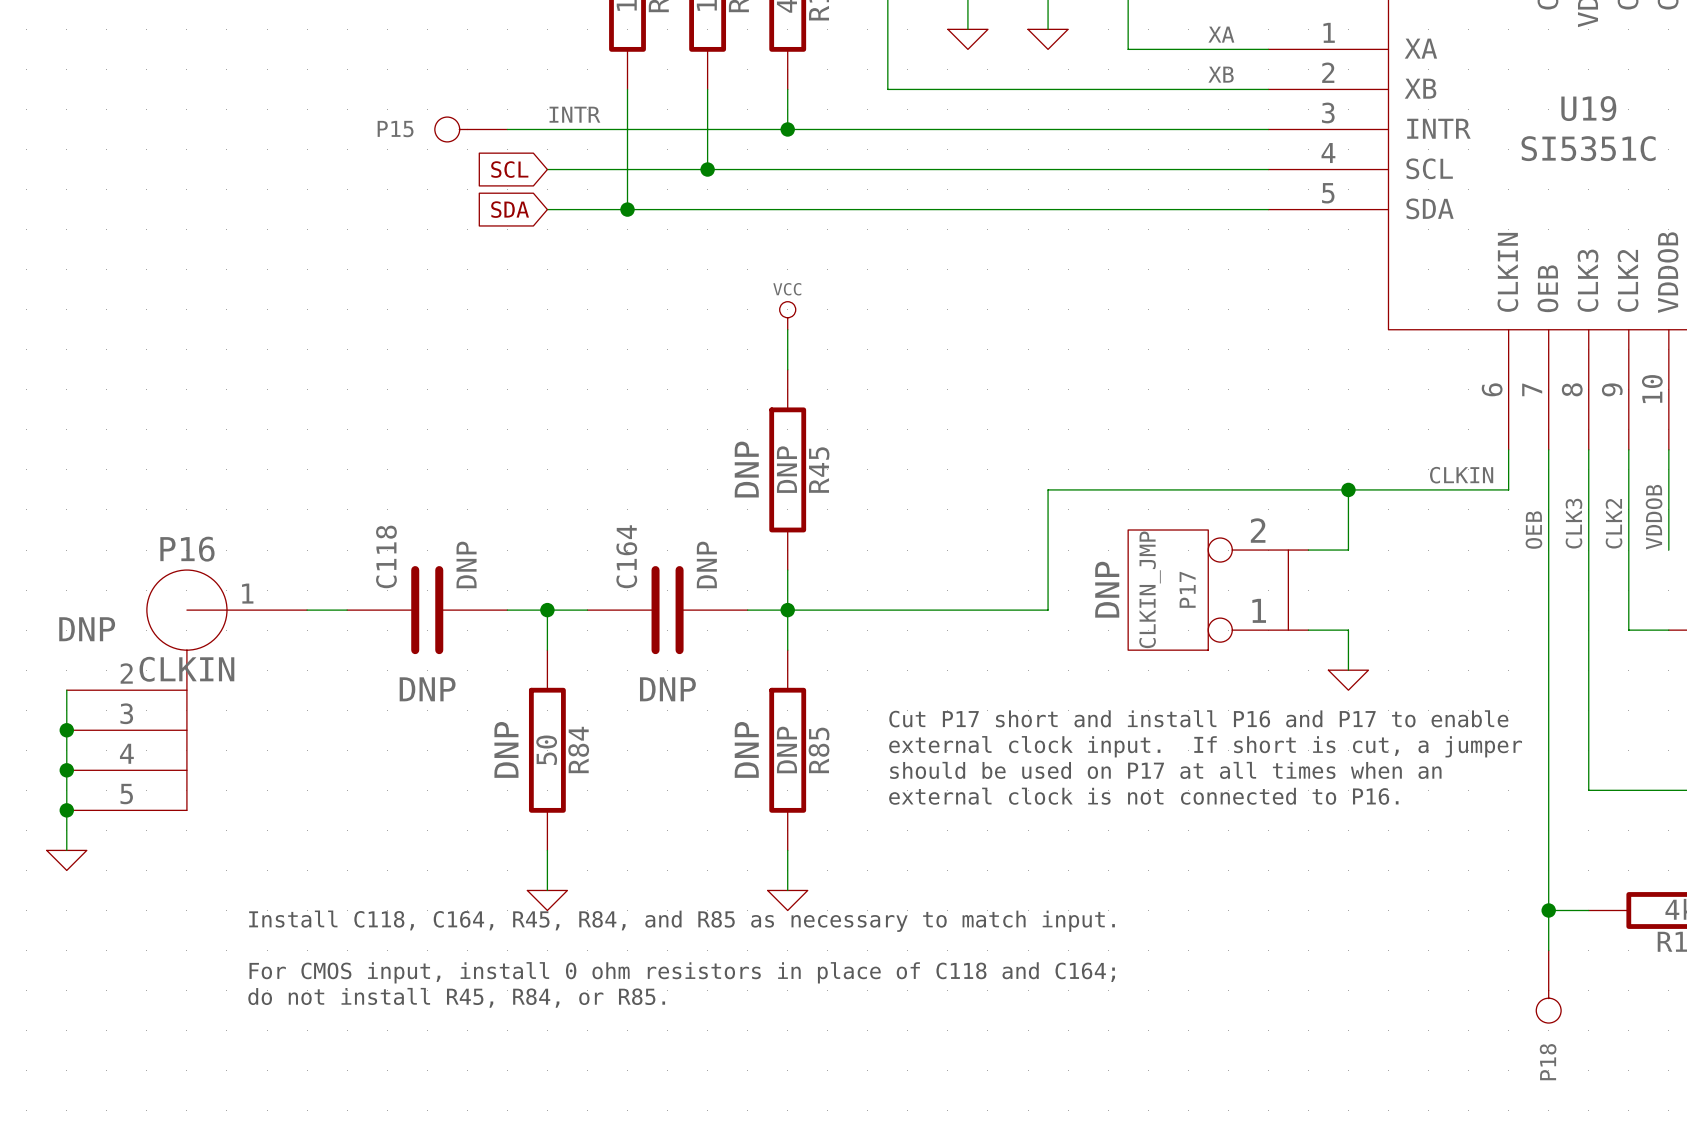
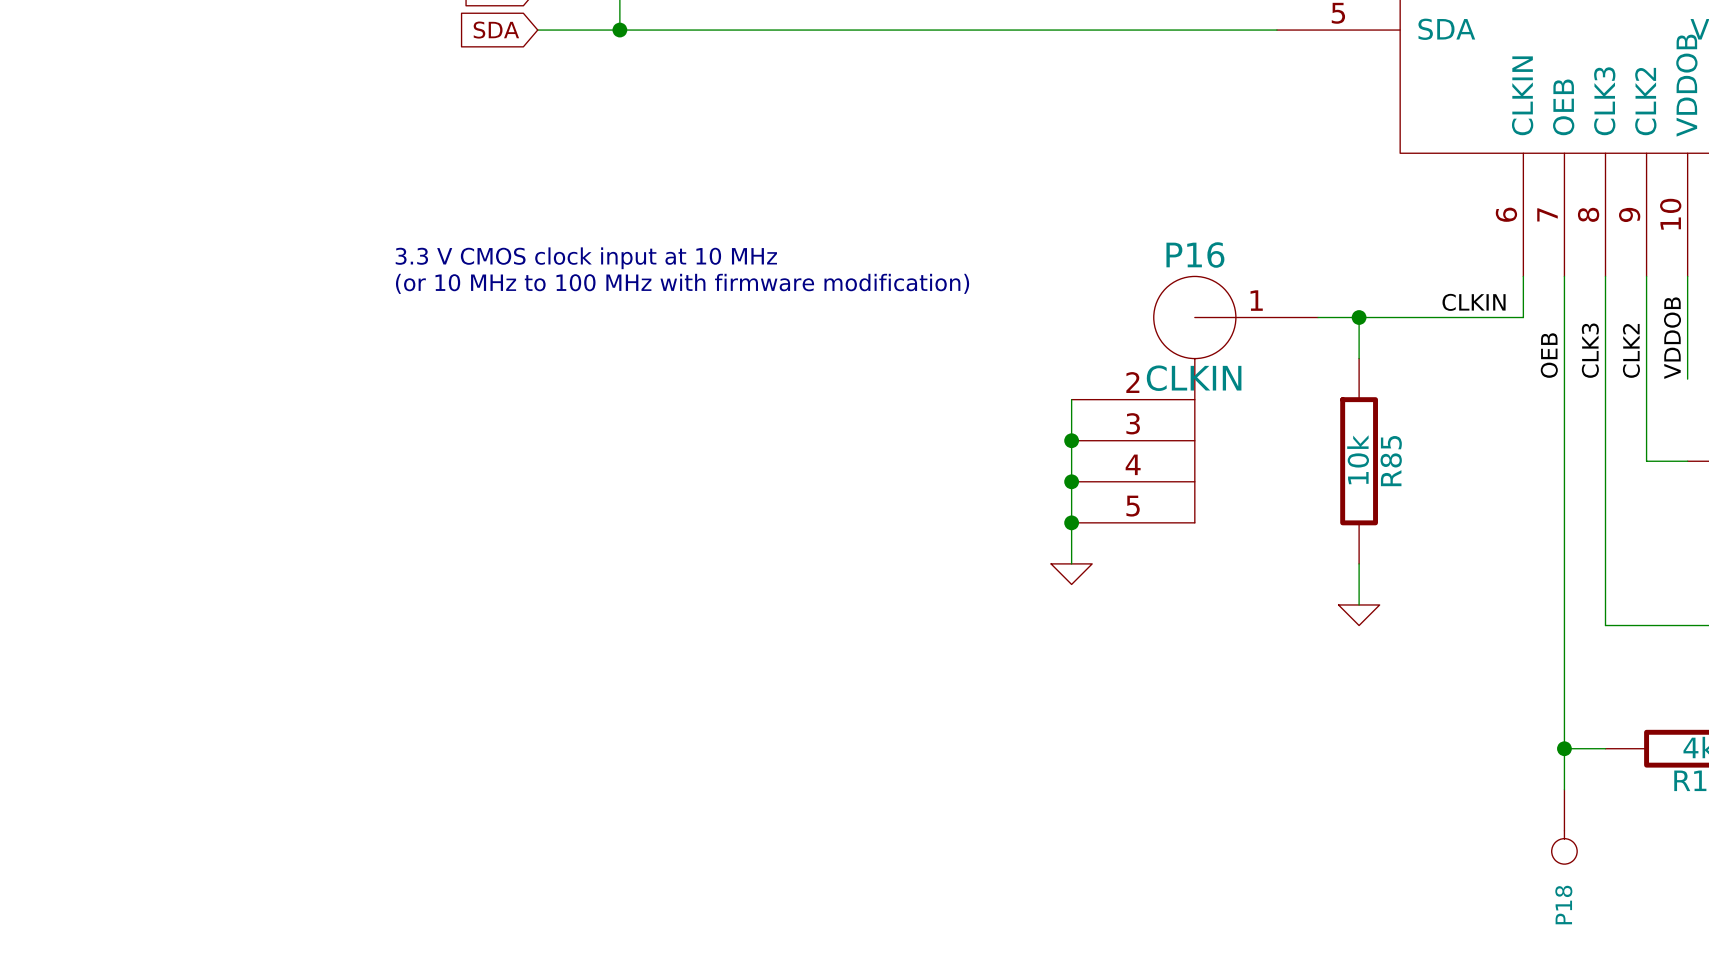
power symbol: VCC (787, 315) -> none
wire: (787, 329) (787, 369) -> none
text: none -> 3.3 V CMOS clock input at 10 MHz (586, 258)
text: none -> (or 10 MHz to 100 MHz with firmware modification) (682, 283)
R45: DNP (787, 469) -> none
wire: (1308, 489) (1048, 489) (1048, 610) (747, 610) -> none
wire: (1348, 530) (1348, 550) (1308, 550) -> none
wire: (787, 570) (787, 650) -> none
wire: none -> (1071, 399) (1071, 563)
P17: CLKIN_JMP (1218, 590) -> none
wire: (307, 610) (347, 610) -> none
C118: DNP (427, 610) -> none
wire: (507, 610) (587, 610) -> none
wire: (547, 610) (547, 650) -> none
junction: (547, 610) -> none
C164: DNP (667, 610) -> none
junction: (787, 610) -> none
junction: none -> (1071, 440)
P16 text: DNP (87, 629) -> none
wire: (1308, 630) (1348, 630) (1348, 670) -> none
junction: none -> (1071, 481)
power symbol position: (1348, 680) -> (1359, 615)
wire: (66, 690) (66, 850) -> none
P16 position: (186, 690) -> (1194, 399)
junction: none -> (1071, 522)
text: Cut P17 short and install P16 and P17 to enable (1198, 718) -> none
junction: (66, 730) -> none
wire: none -> (1359, 563) (1359, 604)
power symbol: none -> (1071, 574)
text: external clock input. If short is cut, a jumper (1205, 746) -> none
R85 text: DNP (746, 749) -> none
R85 value: DNP (786, 749) -> 10k (1358, 459)
R84: 50 (547, 750) -> none
R85 position: (787, 750) -> (1359, 461)
junction: (66, 770) -> none
text: should be used on P17 at all times when an (1165, 770) -> none
text: external clock is not connected to P16. (1143, 796) -> none
junction: (66, 810) -> none
wire: (547, 850) (547, 890) -> none
wire: (787, 850) (787, 890) -> none
power symbol: (66, 860) -> none
power symbol: (547, 900) -> none
power symbol: (787, 900) -> none
text: Install C118, C164, R45, R84, and R85 as necessary to match input. (682, 921) -> none
text: For CMOS input, install 0 ohm resistors in place of C118 and C164; (682, 972) -> none
text: do not install R45, R84, or R85. (456, 997) -> none

